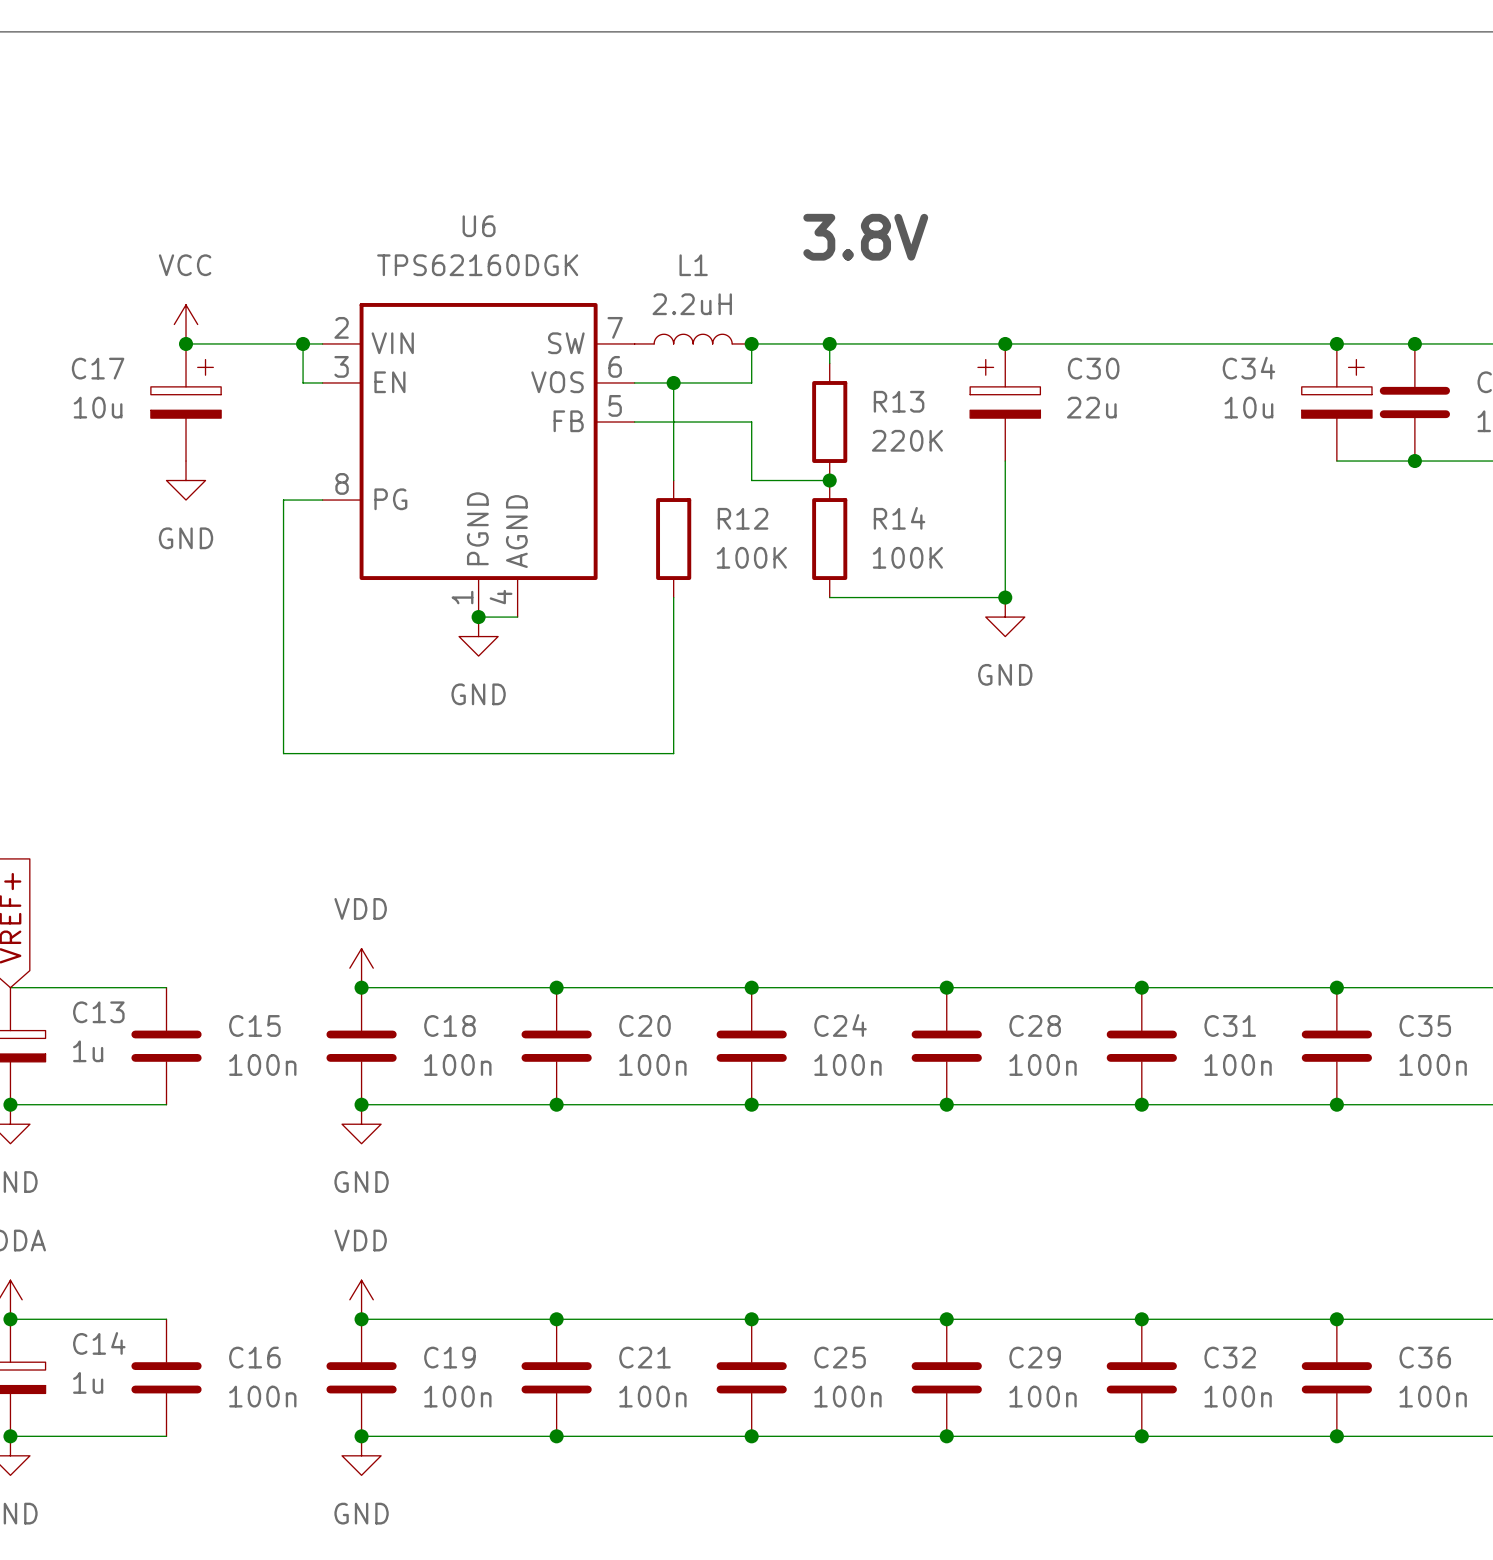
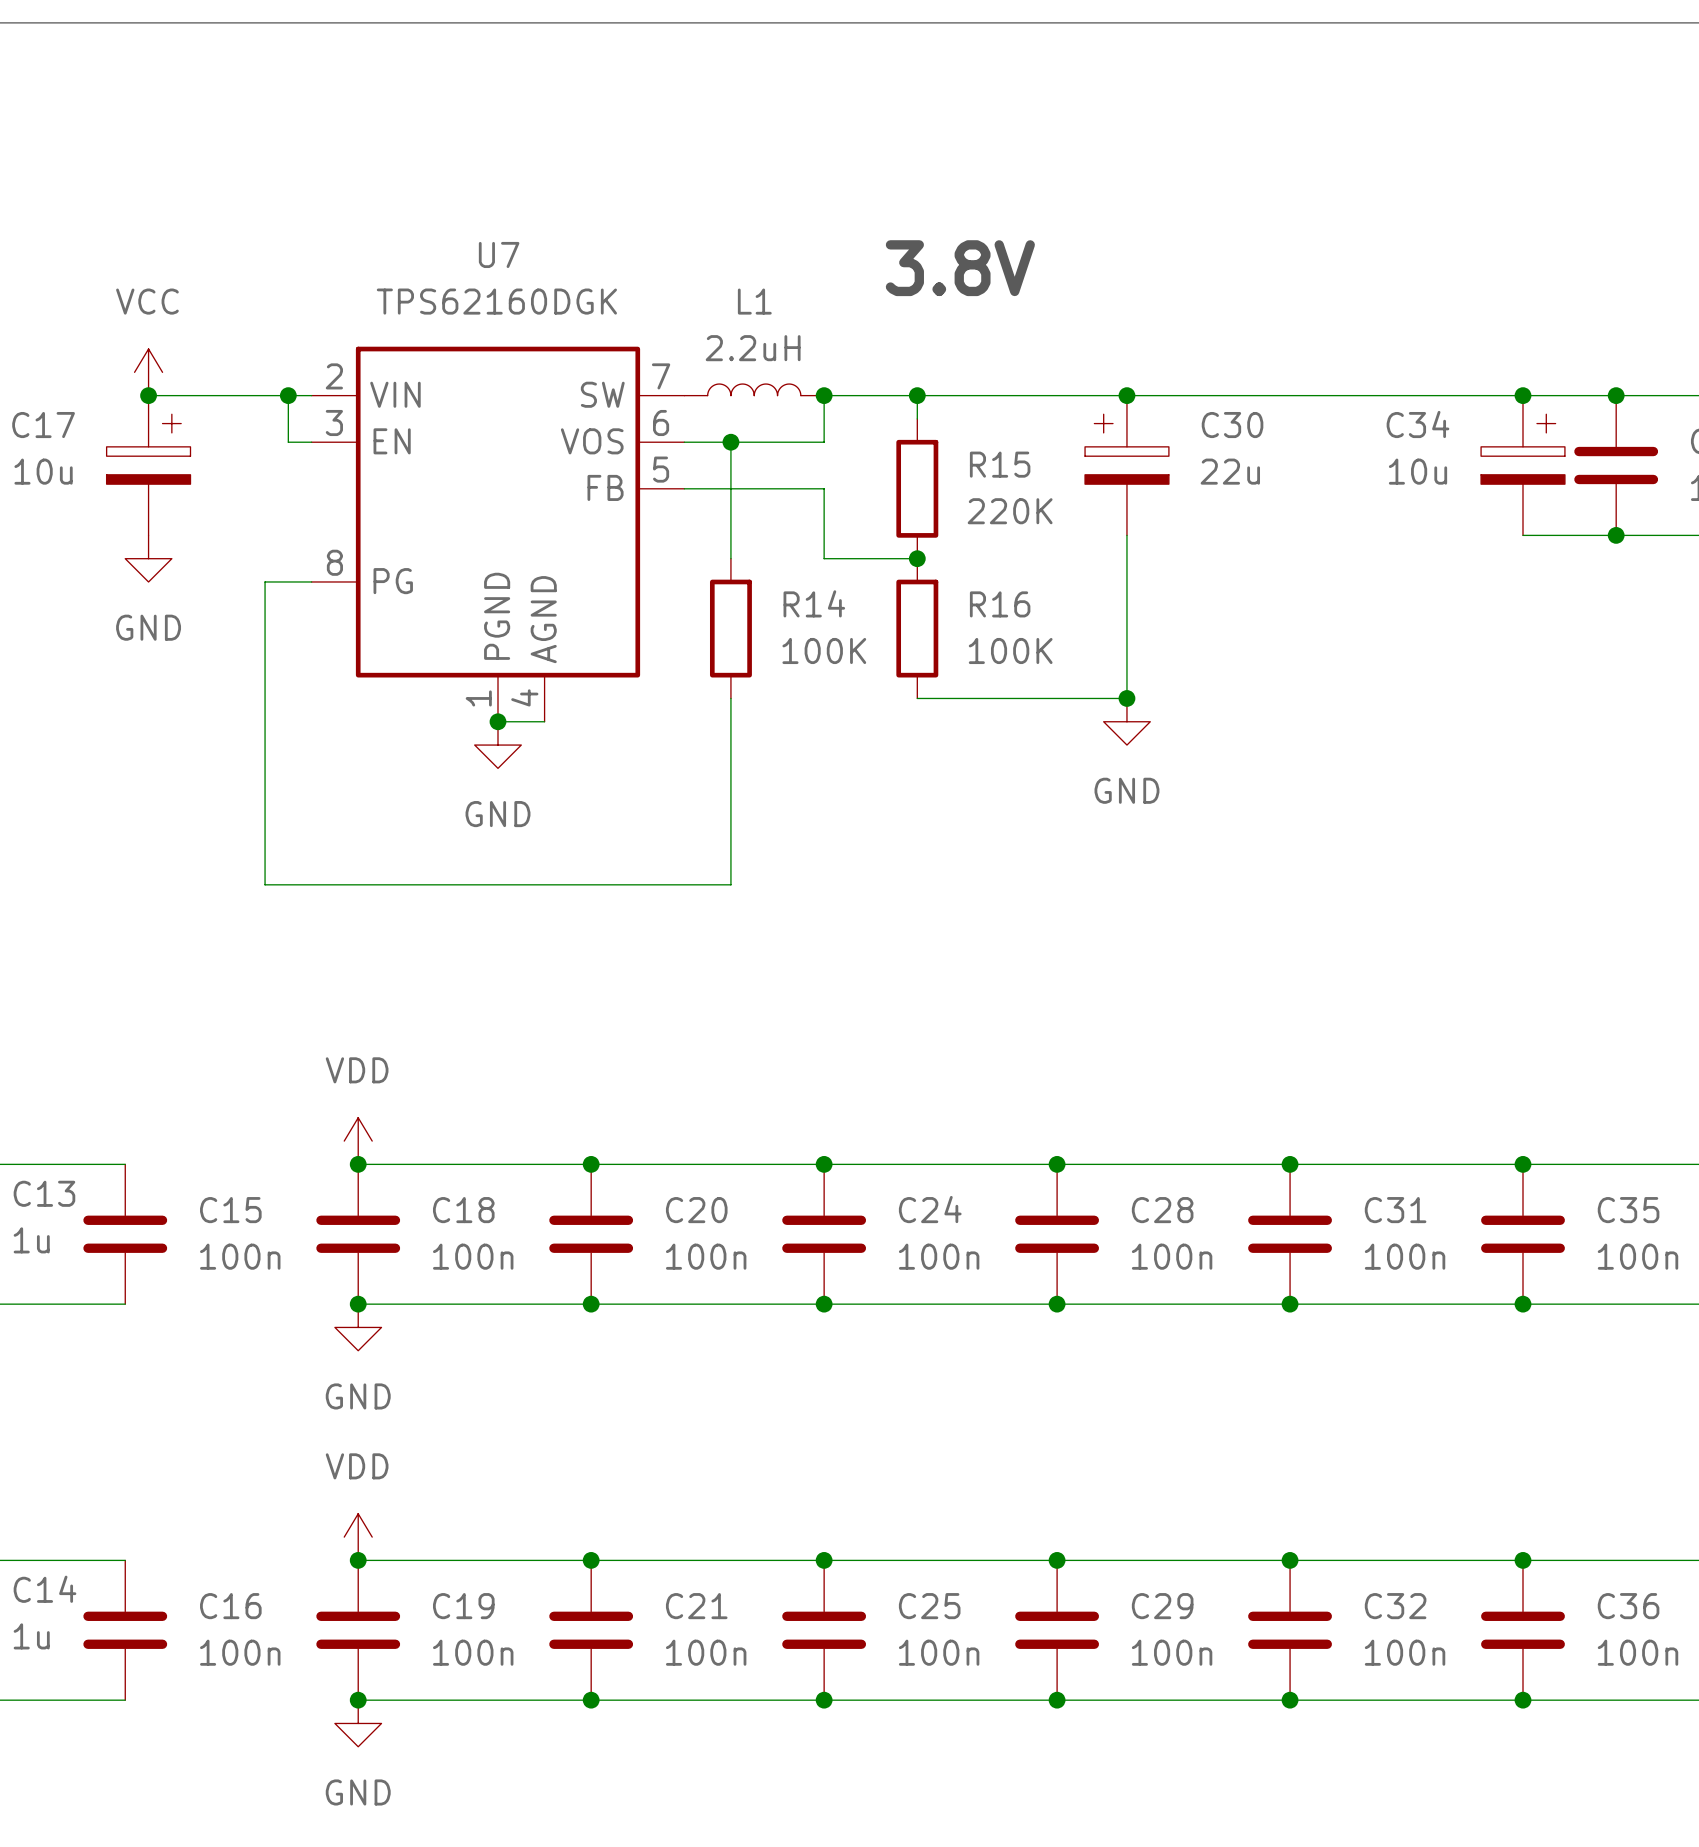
U6 name: U6 (479, 226) -> U7 (499, 254)
R13 name: R13 (899, 401) -> R15 (1000, 464)
R12 name: R12 (743, 518) -> R14 (814, 603)
R14 name: R14 (899, 518) -> R16 (1000, 604)

